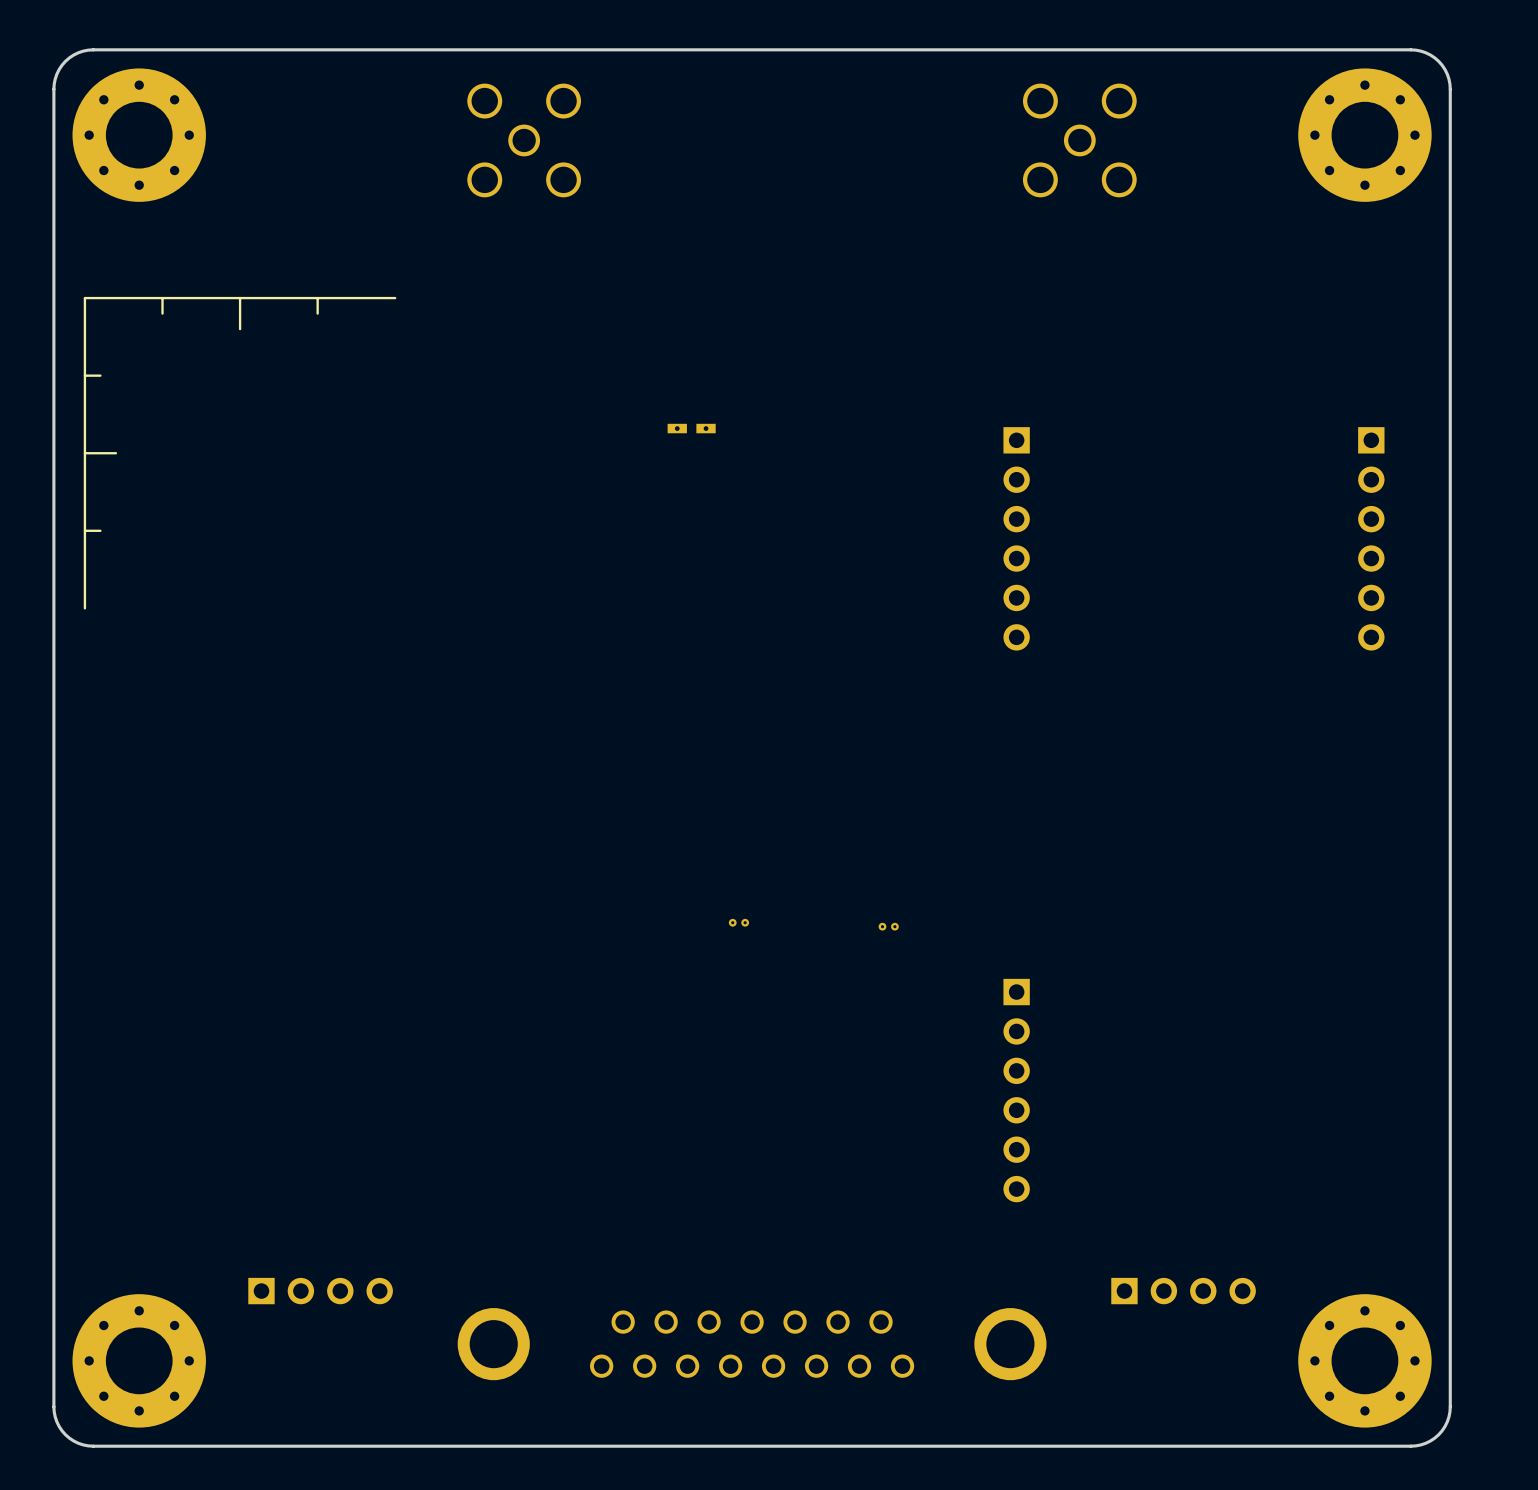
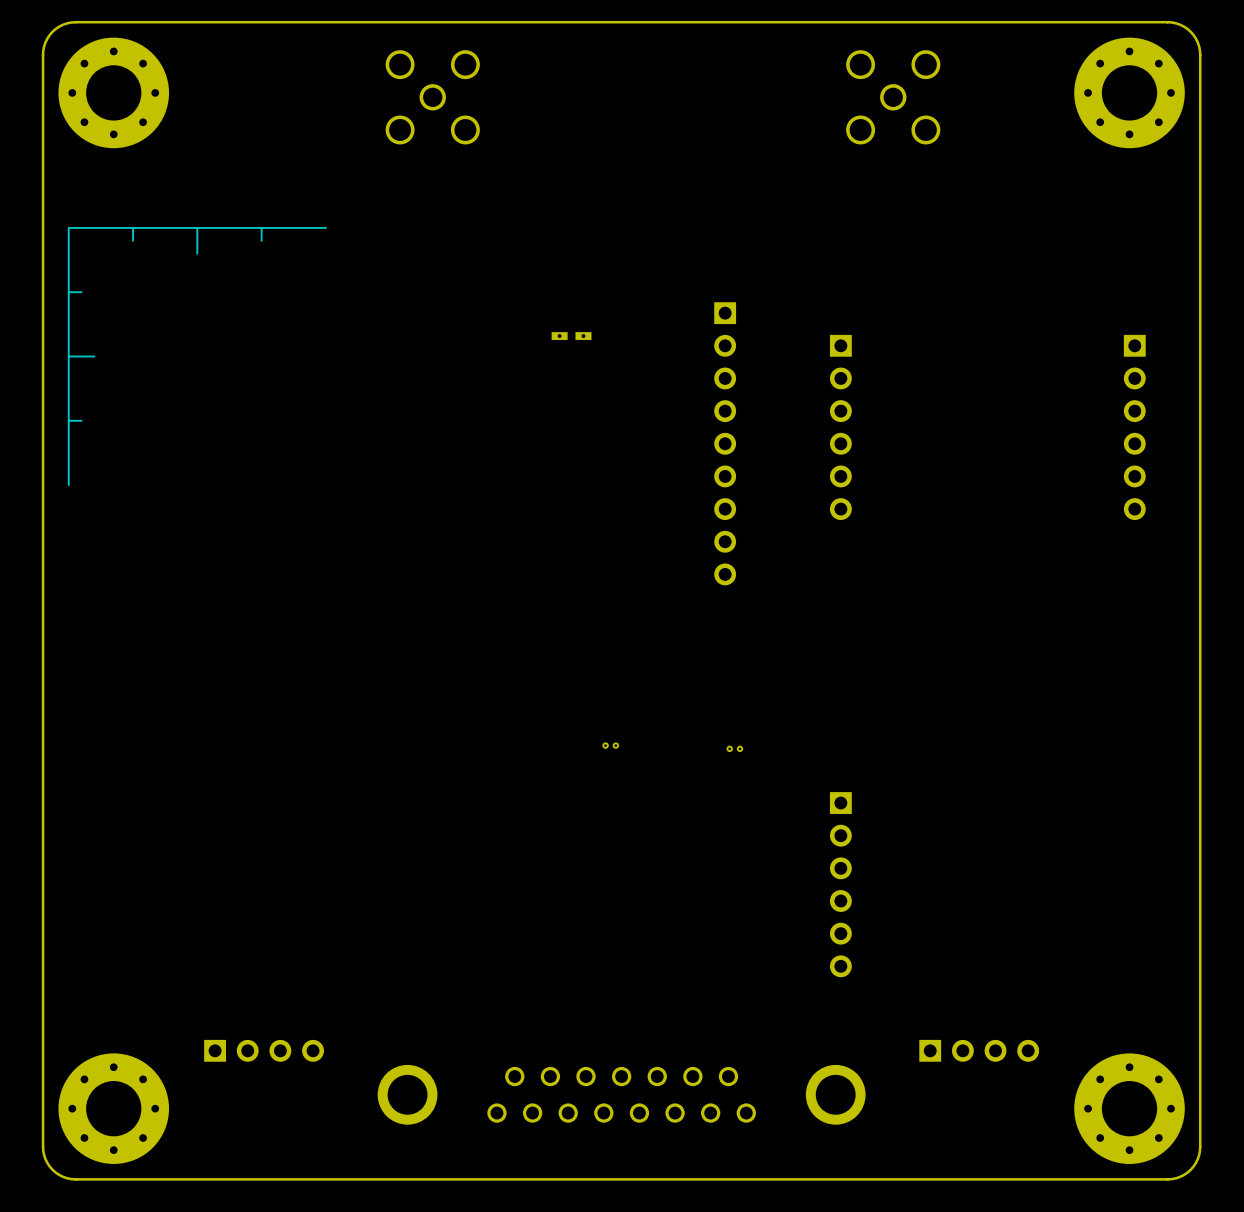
part: none -> (725, 443)

